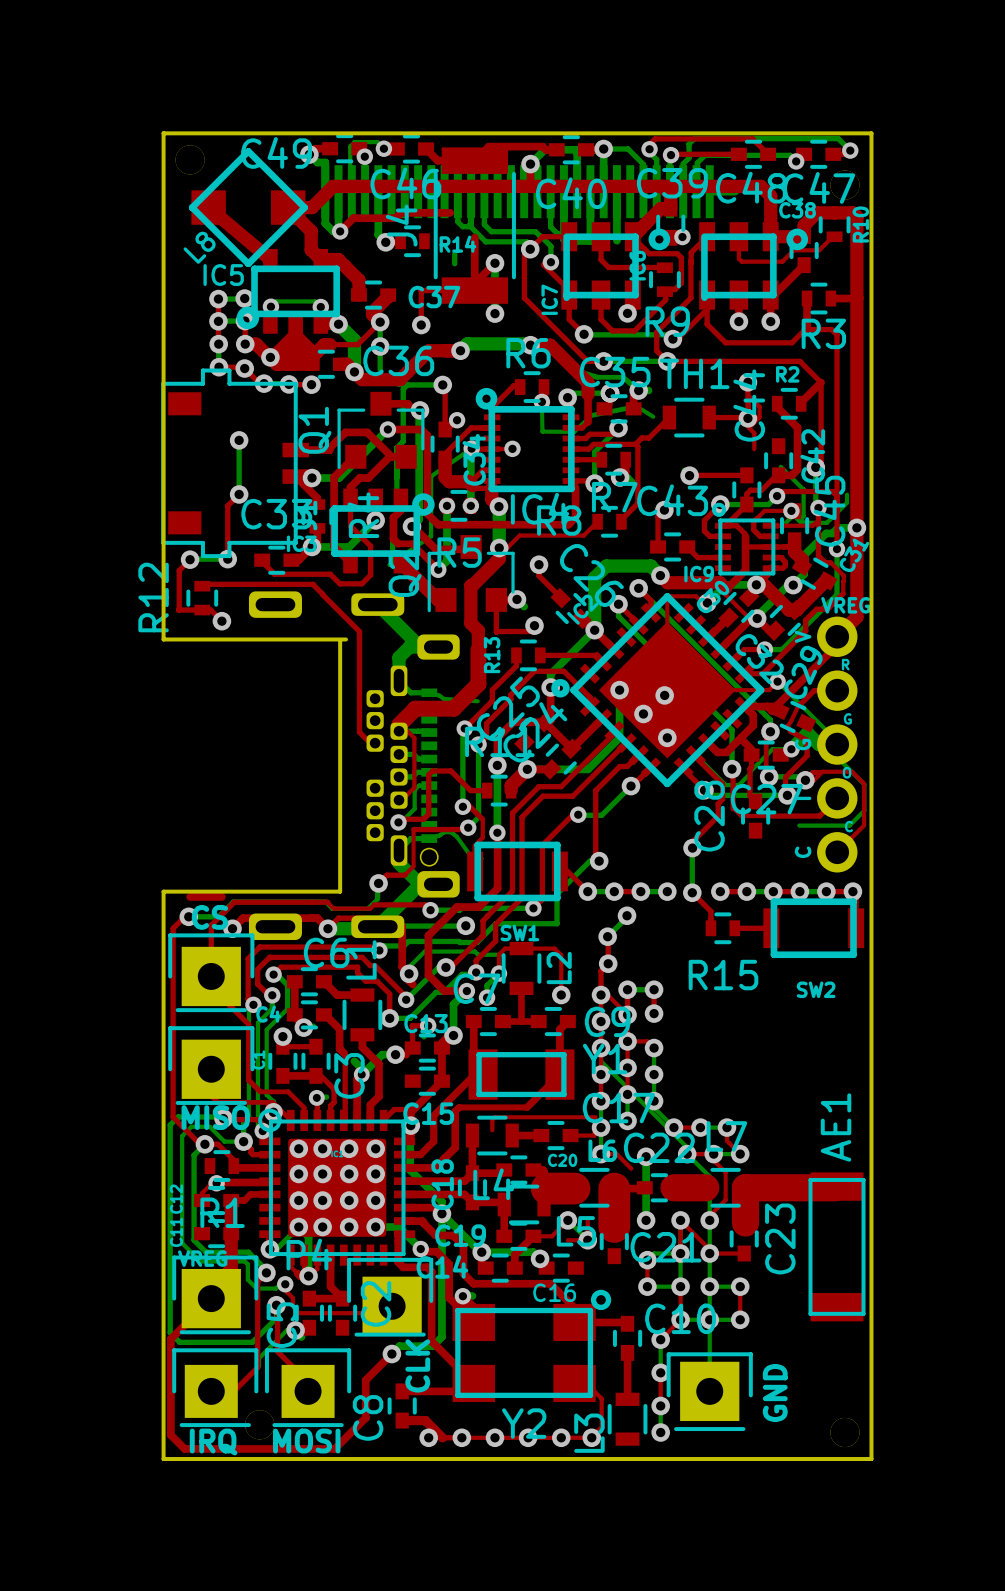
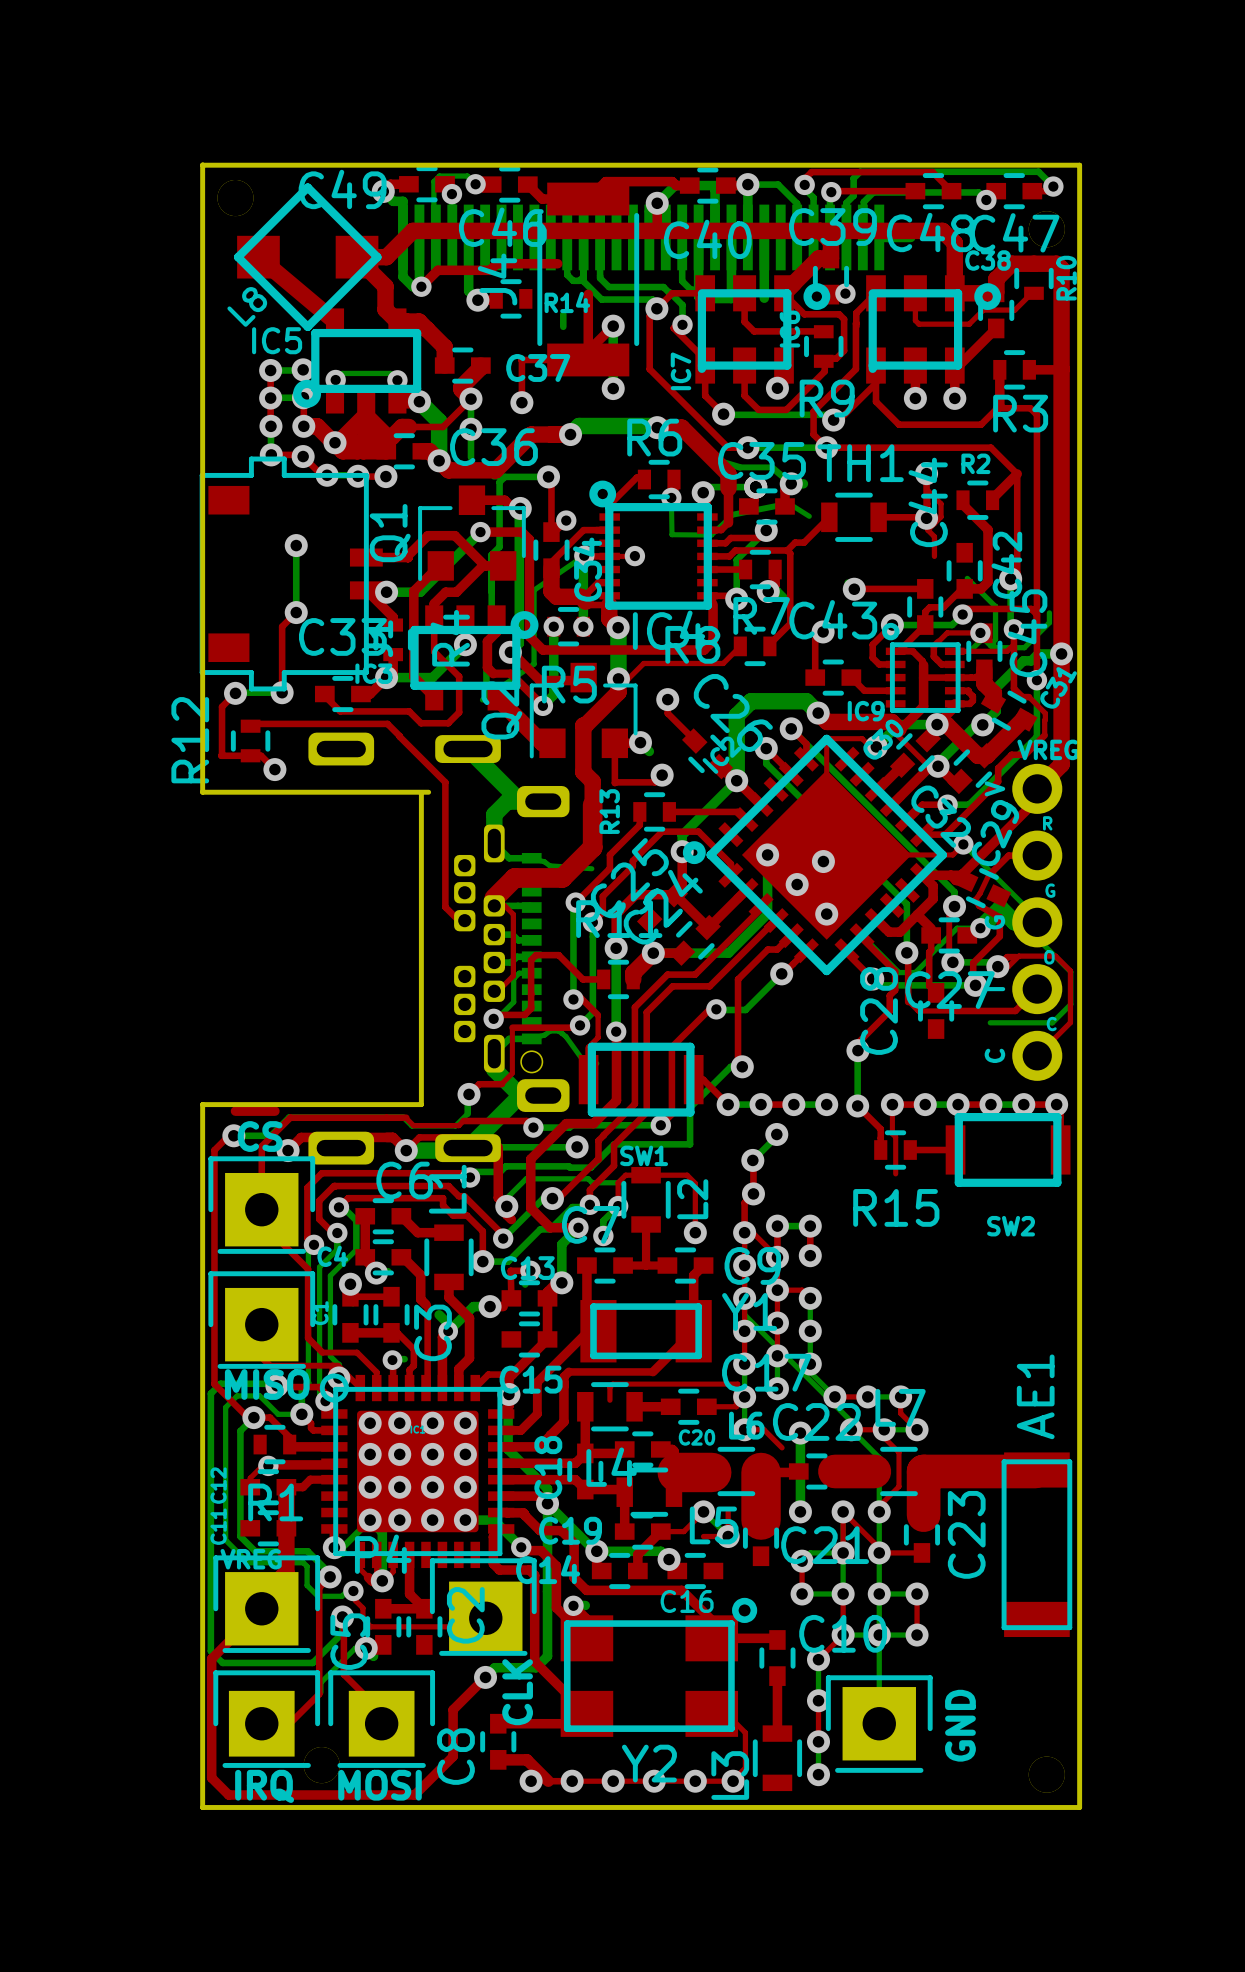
top track: none -> (892, 1104) (892, 1133) (895, 1137) (895, 1173)

